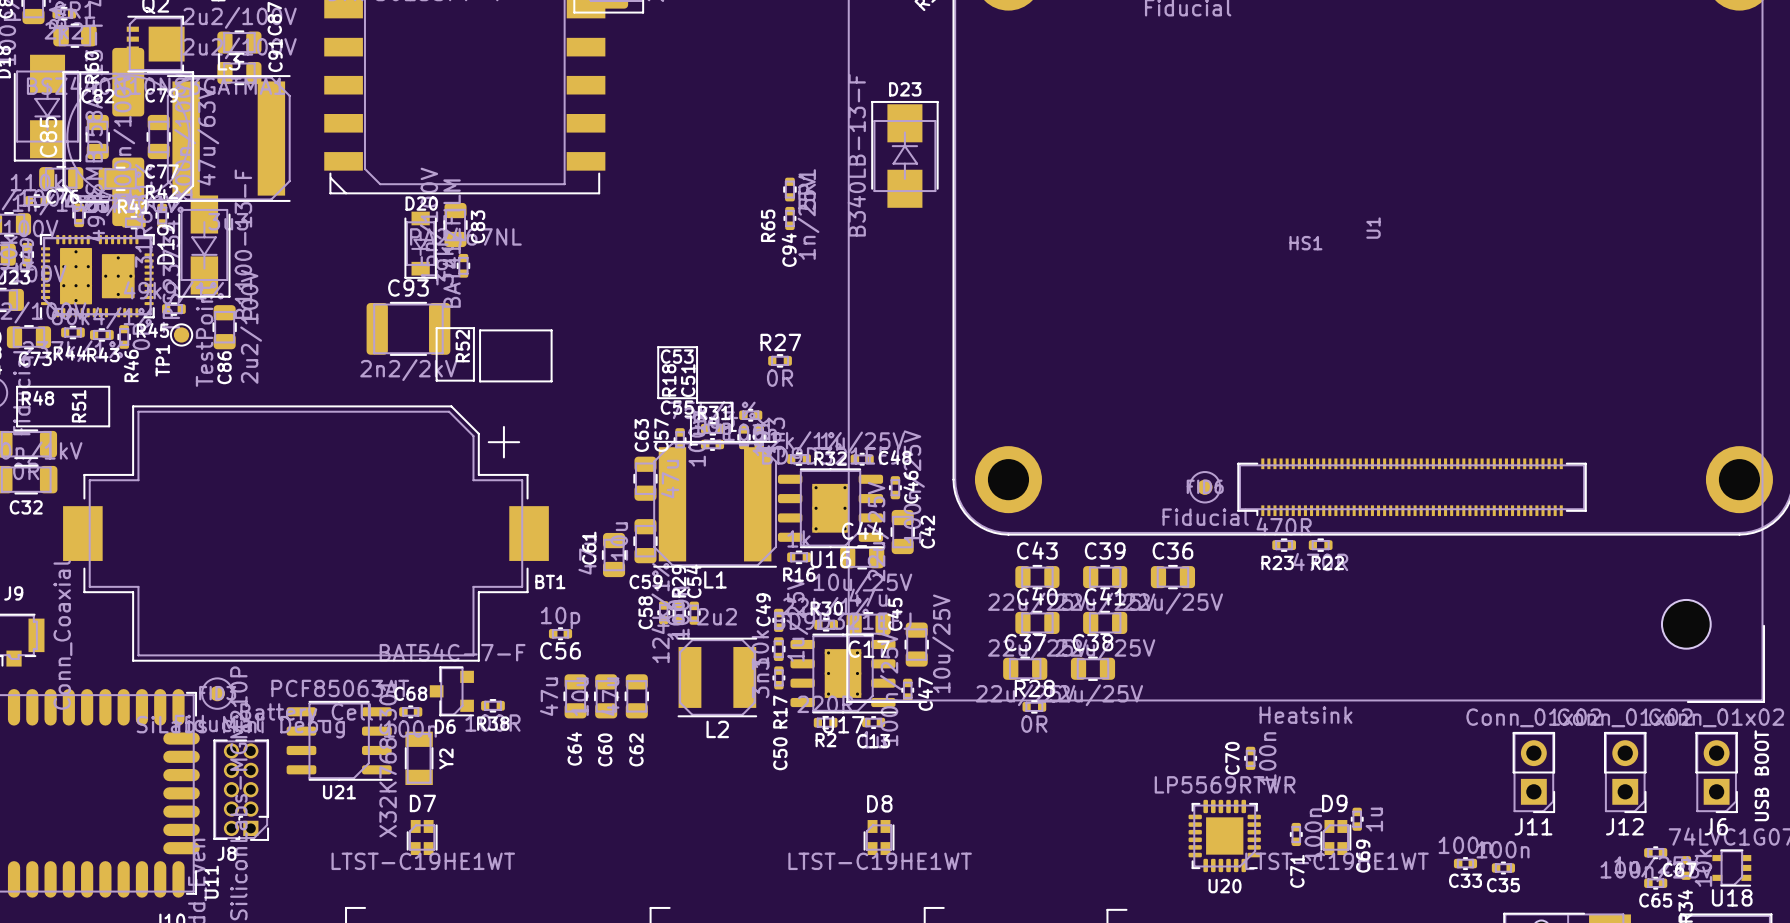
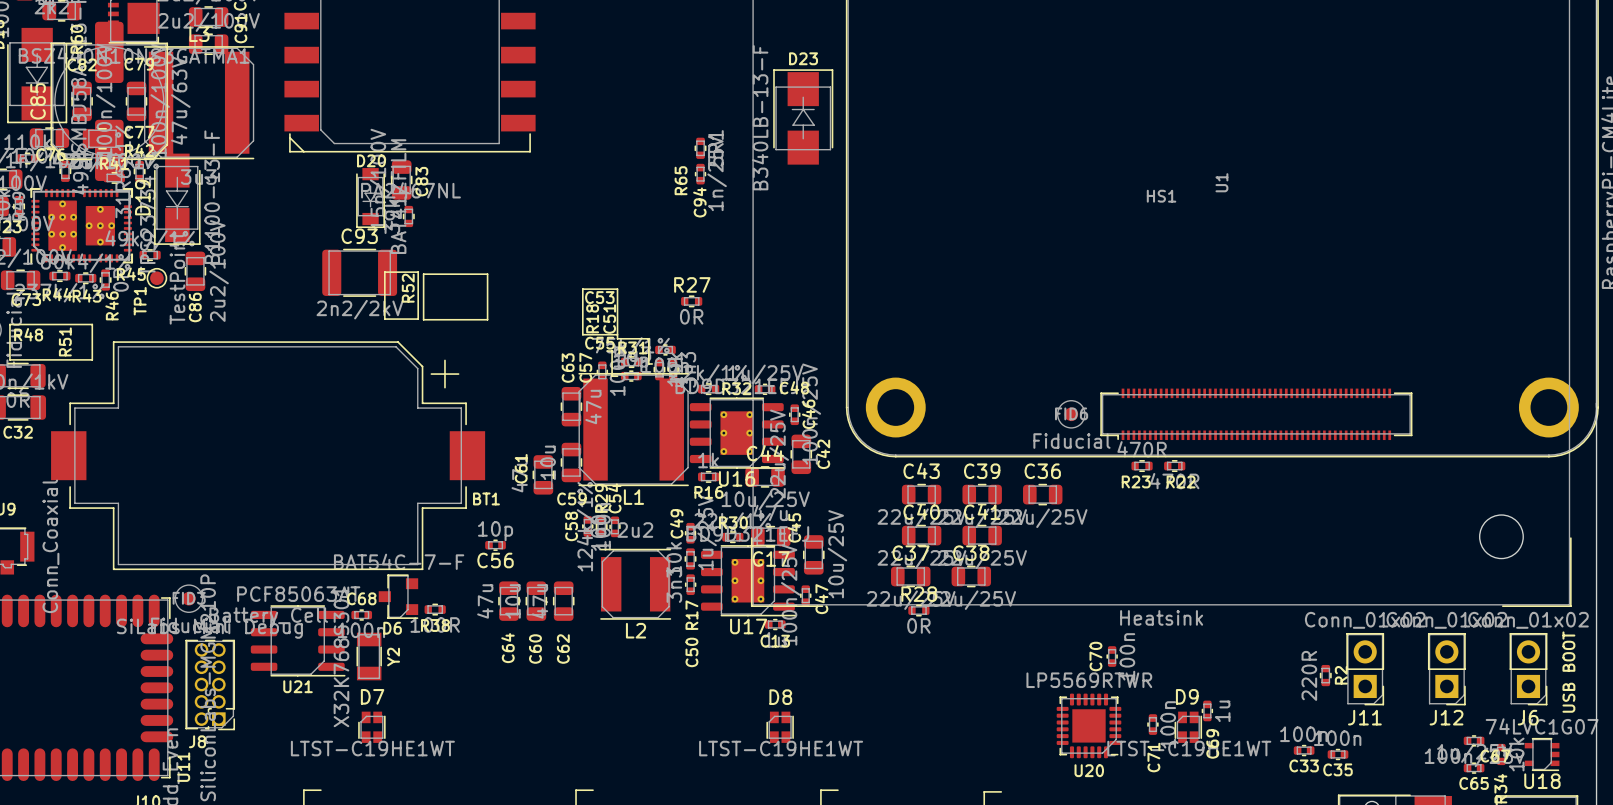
R2 rotation: 0° (825, 722) -> 90° clockwise (1325, 675)
R2 position: (825, 722) -> (1325, 675)

